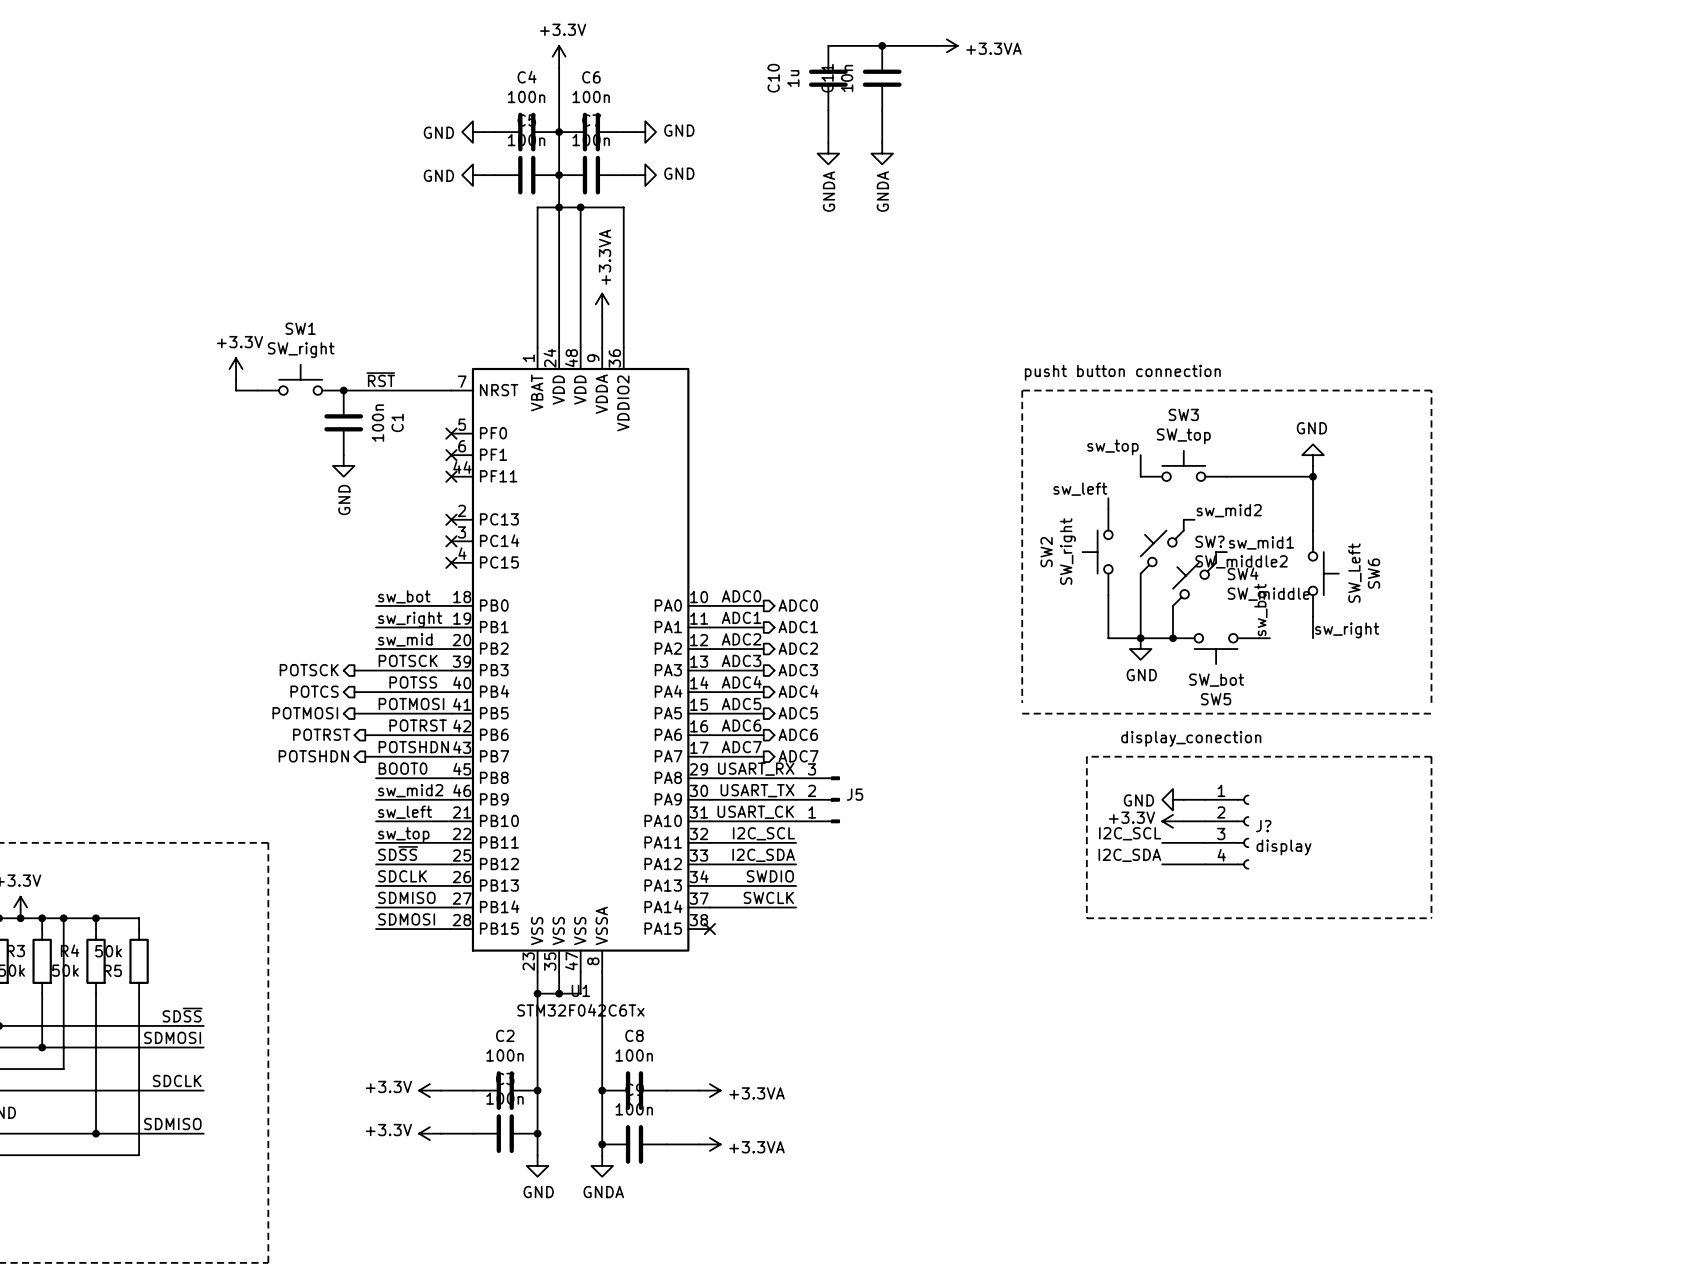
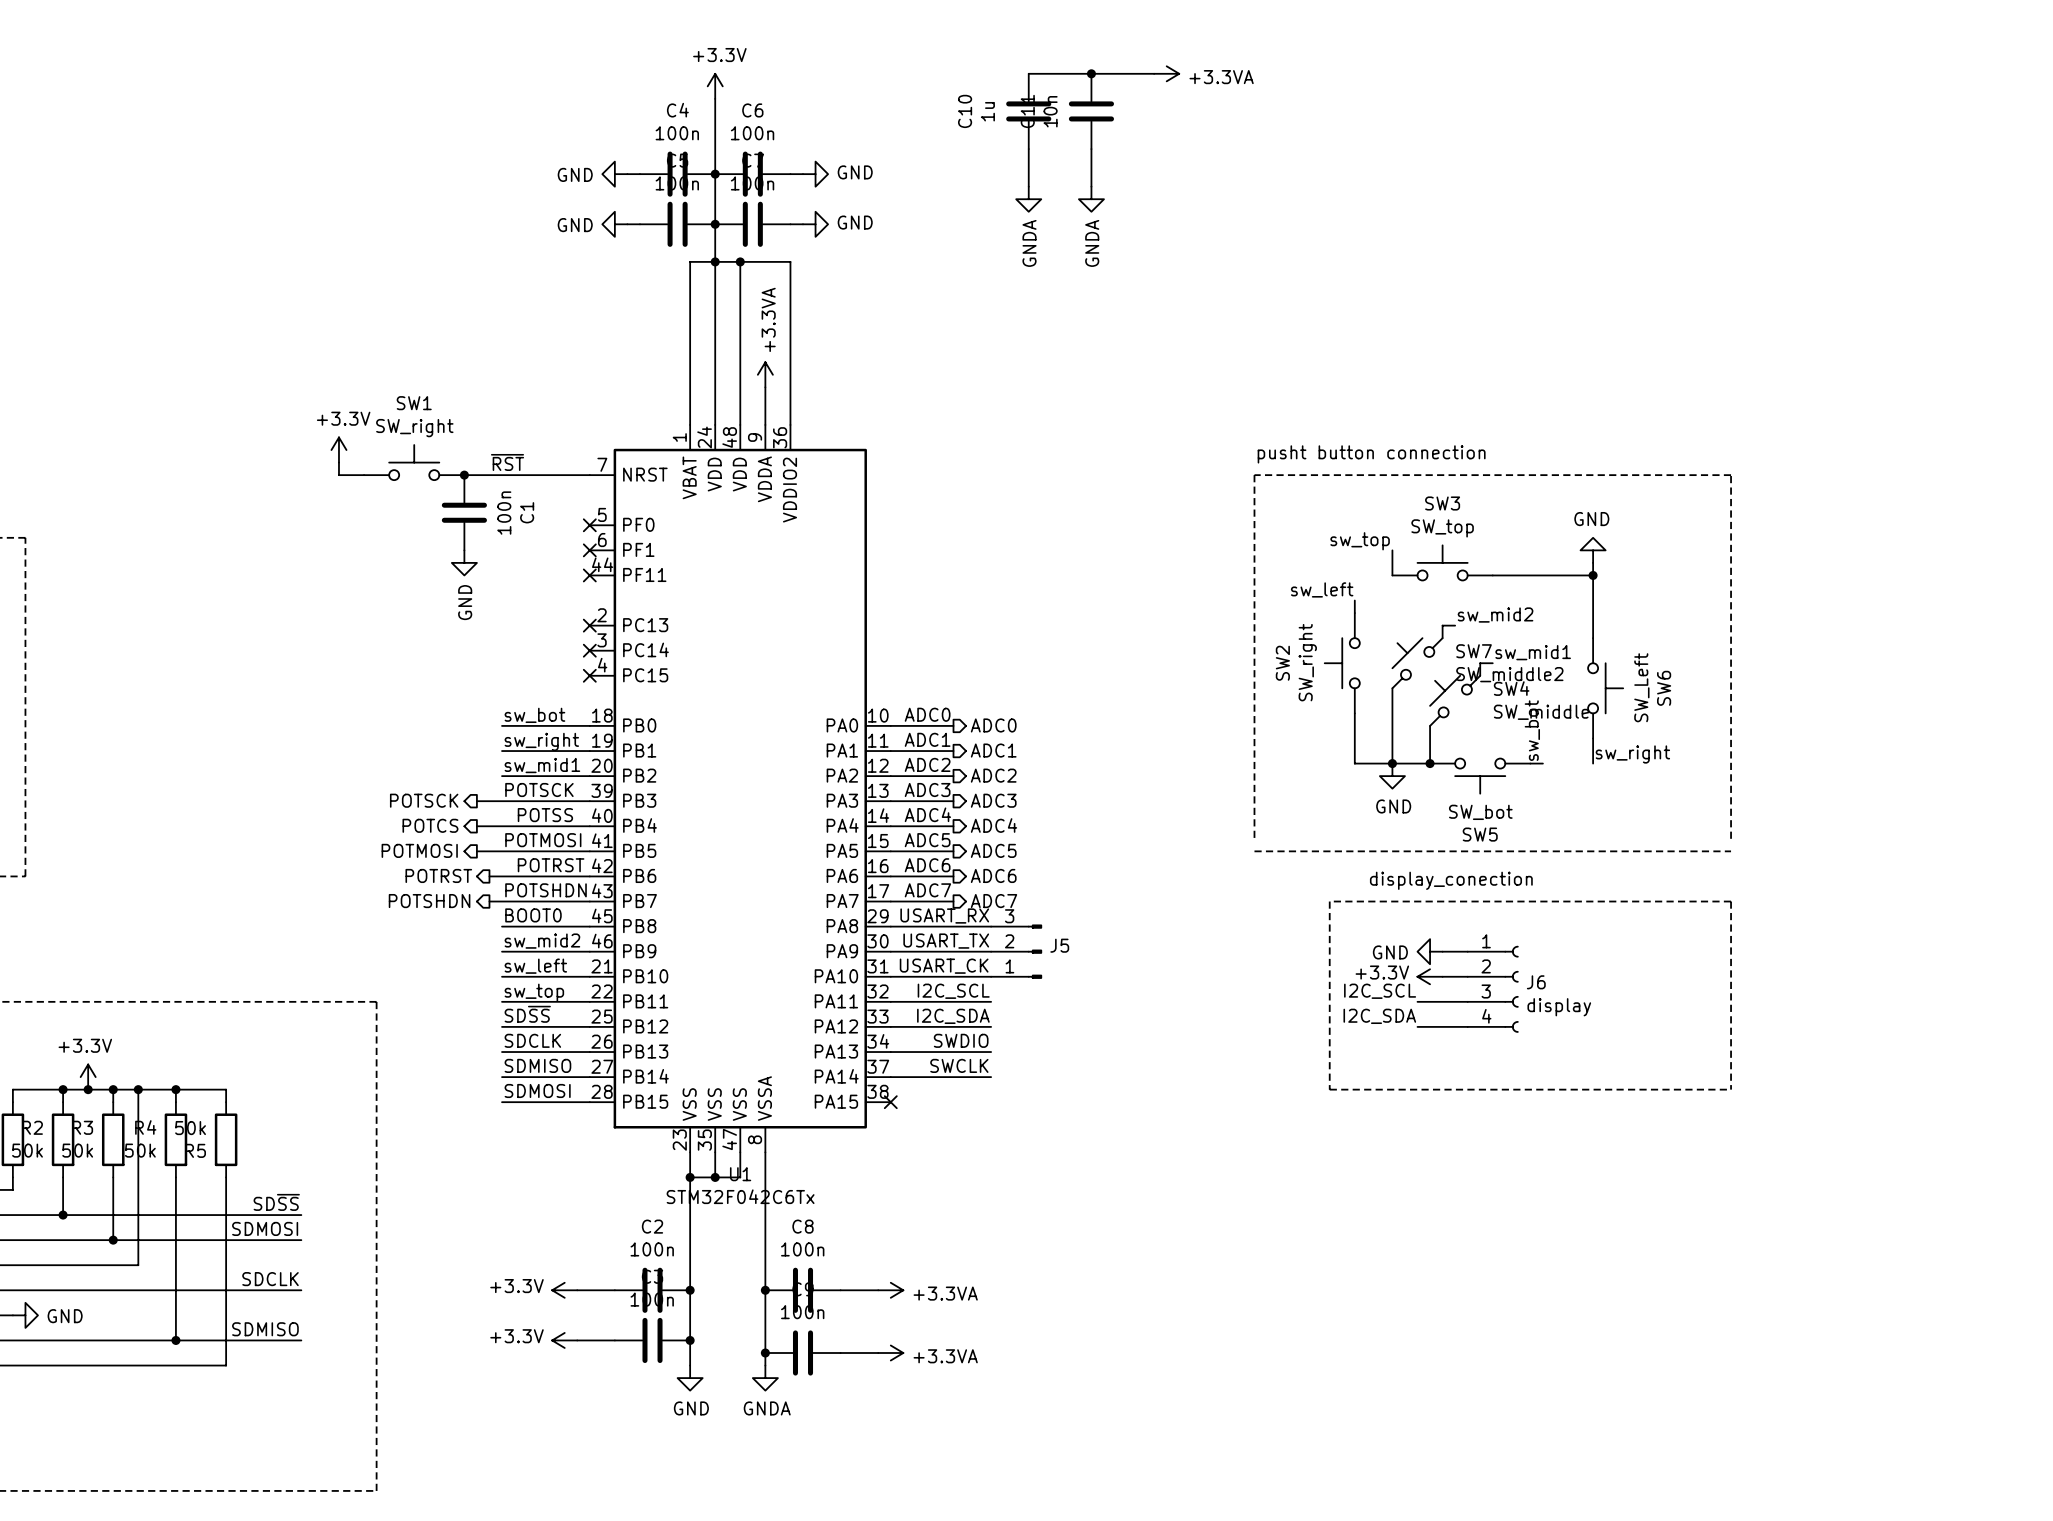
SW? name: SW? (1210, 541) -> SW7 (1474, 651)
label: sw_mid (405, 639) -> sw_mid1 (542, 765)
J? name: J? (1263, 826) -> J6 (1536, 982)

